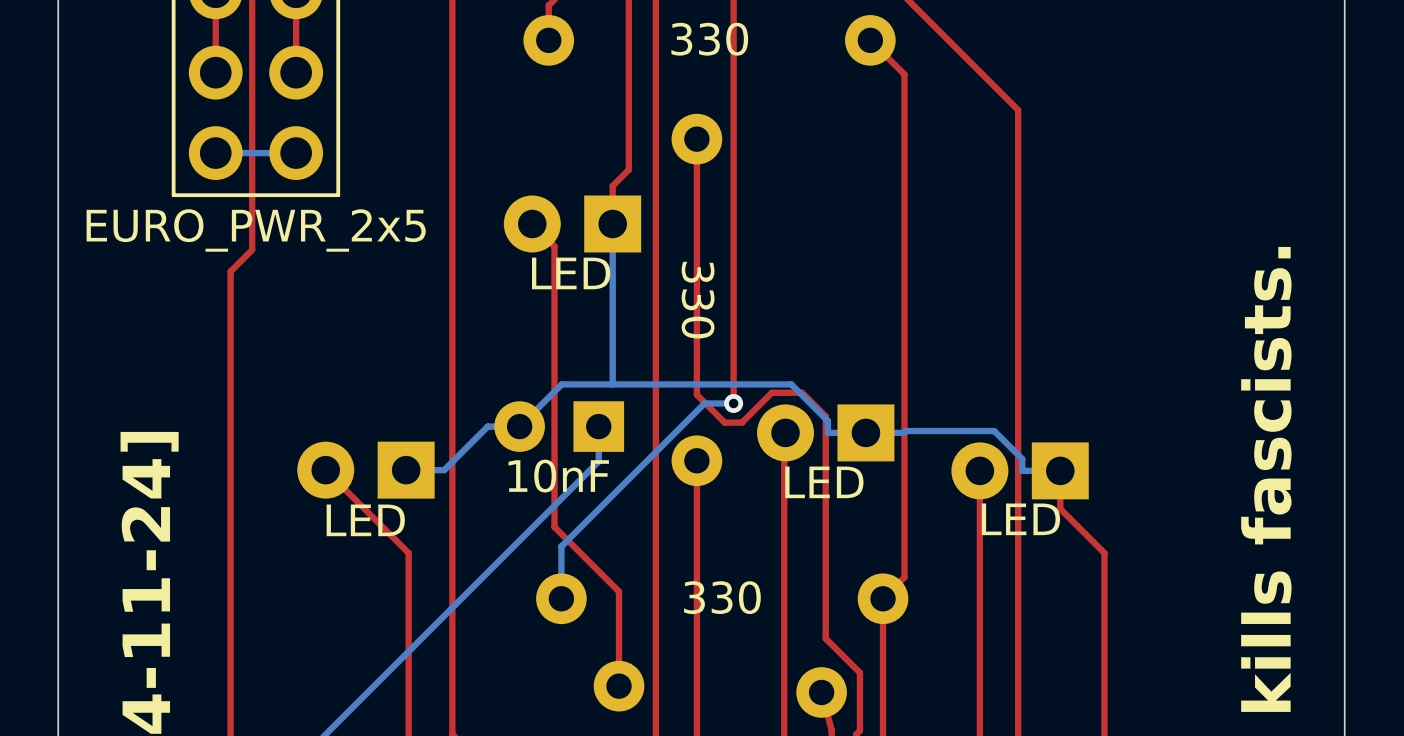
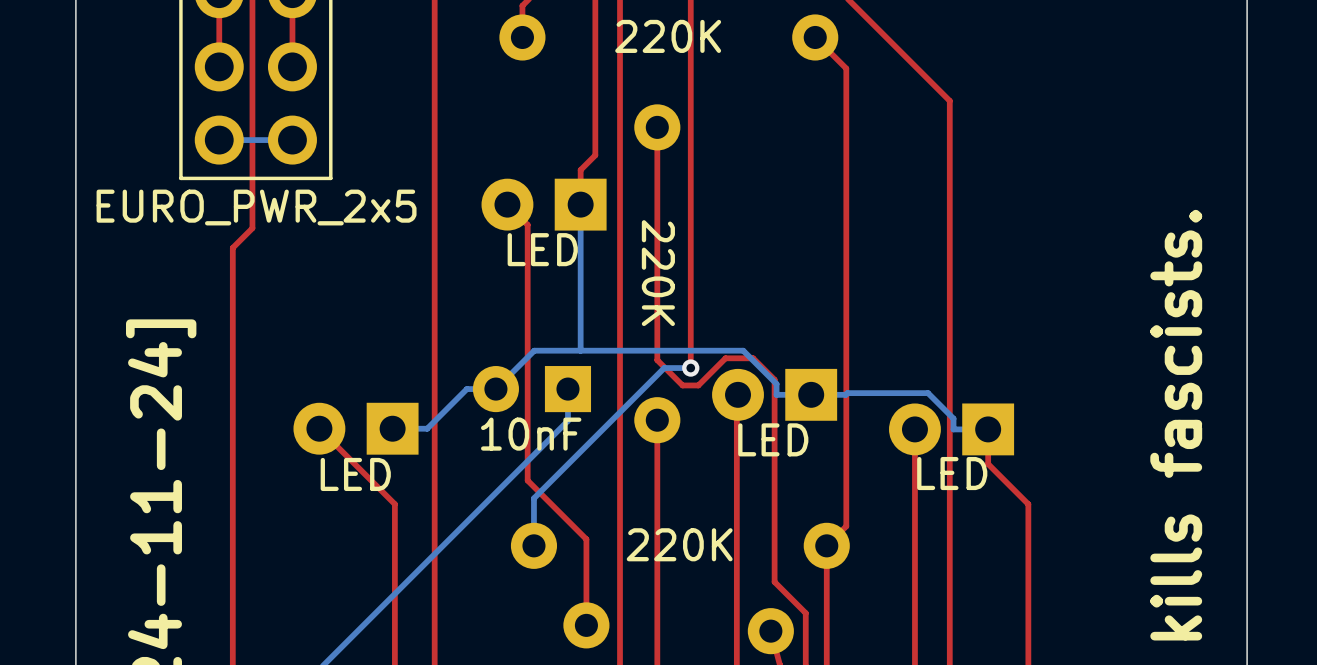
part value: 330 (709, 39) -> 220K (668, 36)
part value: 330 (698, 300) -> 220K (658, 273)
part value: 330 (722, 597) -> 220K (679, 544)

